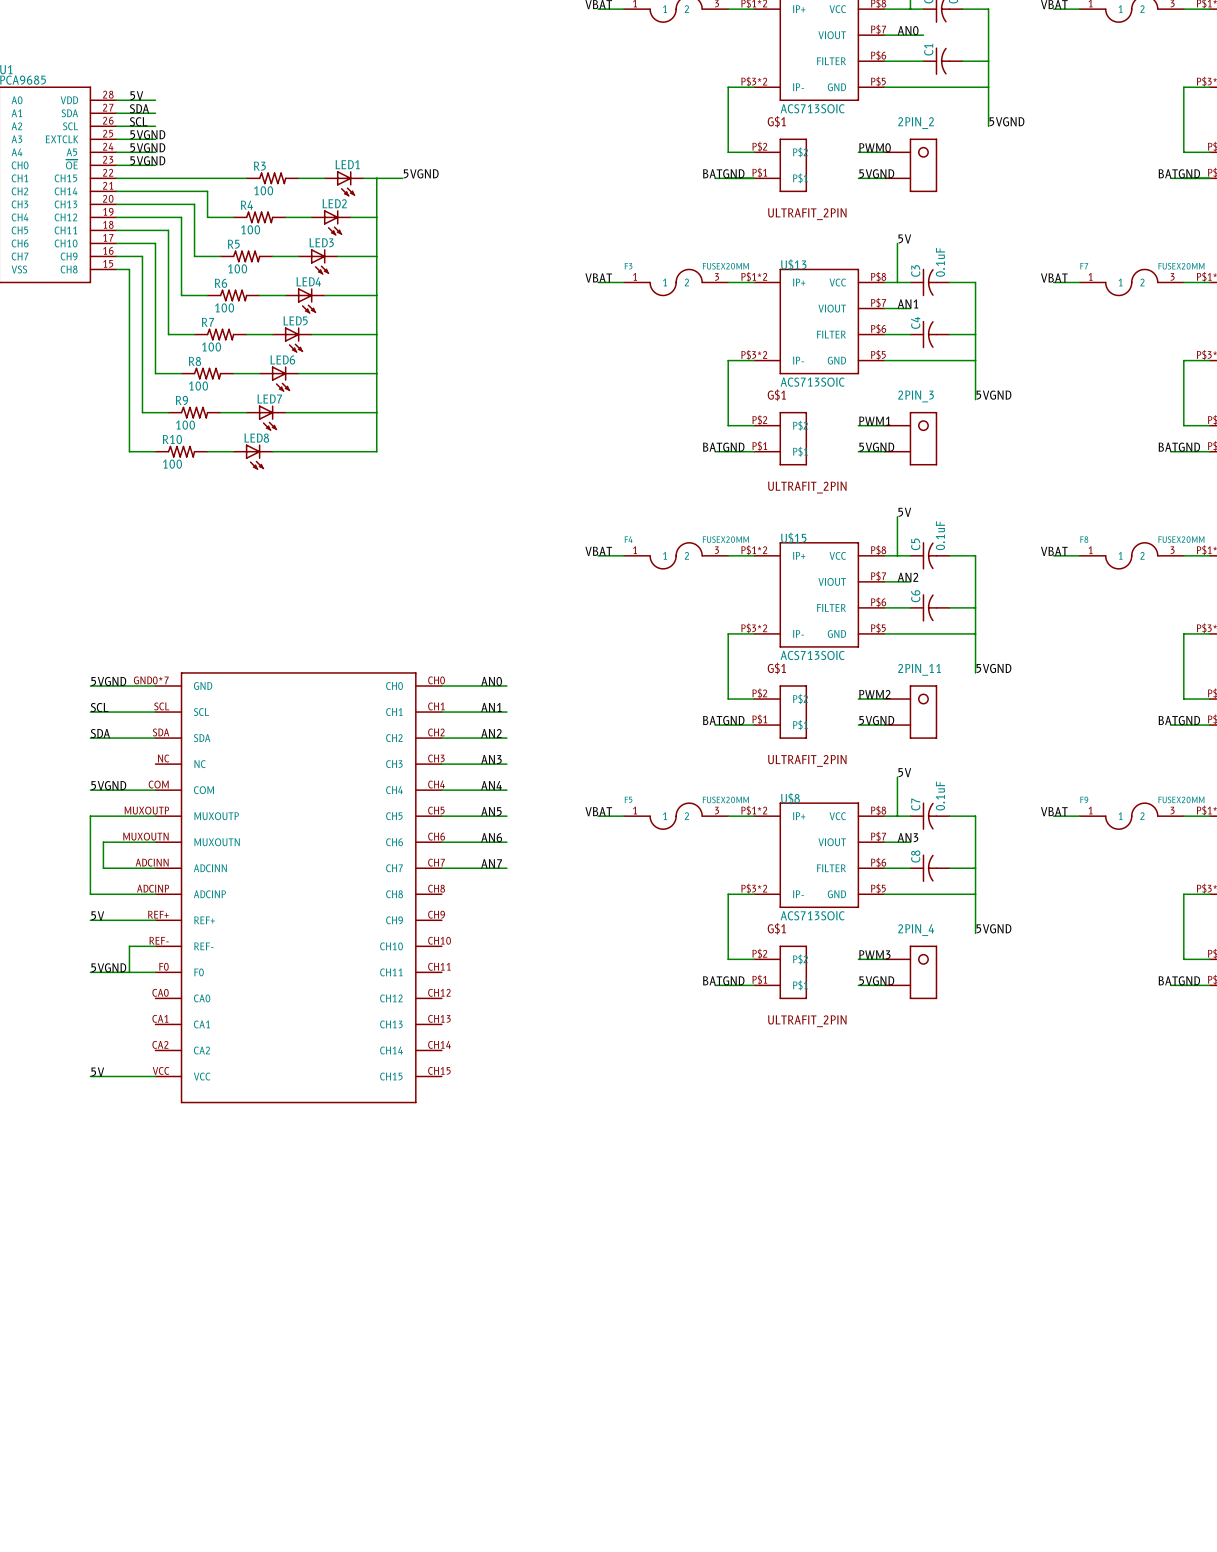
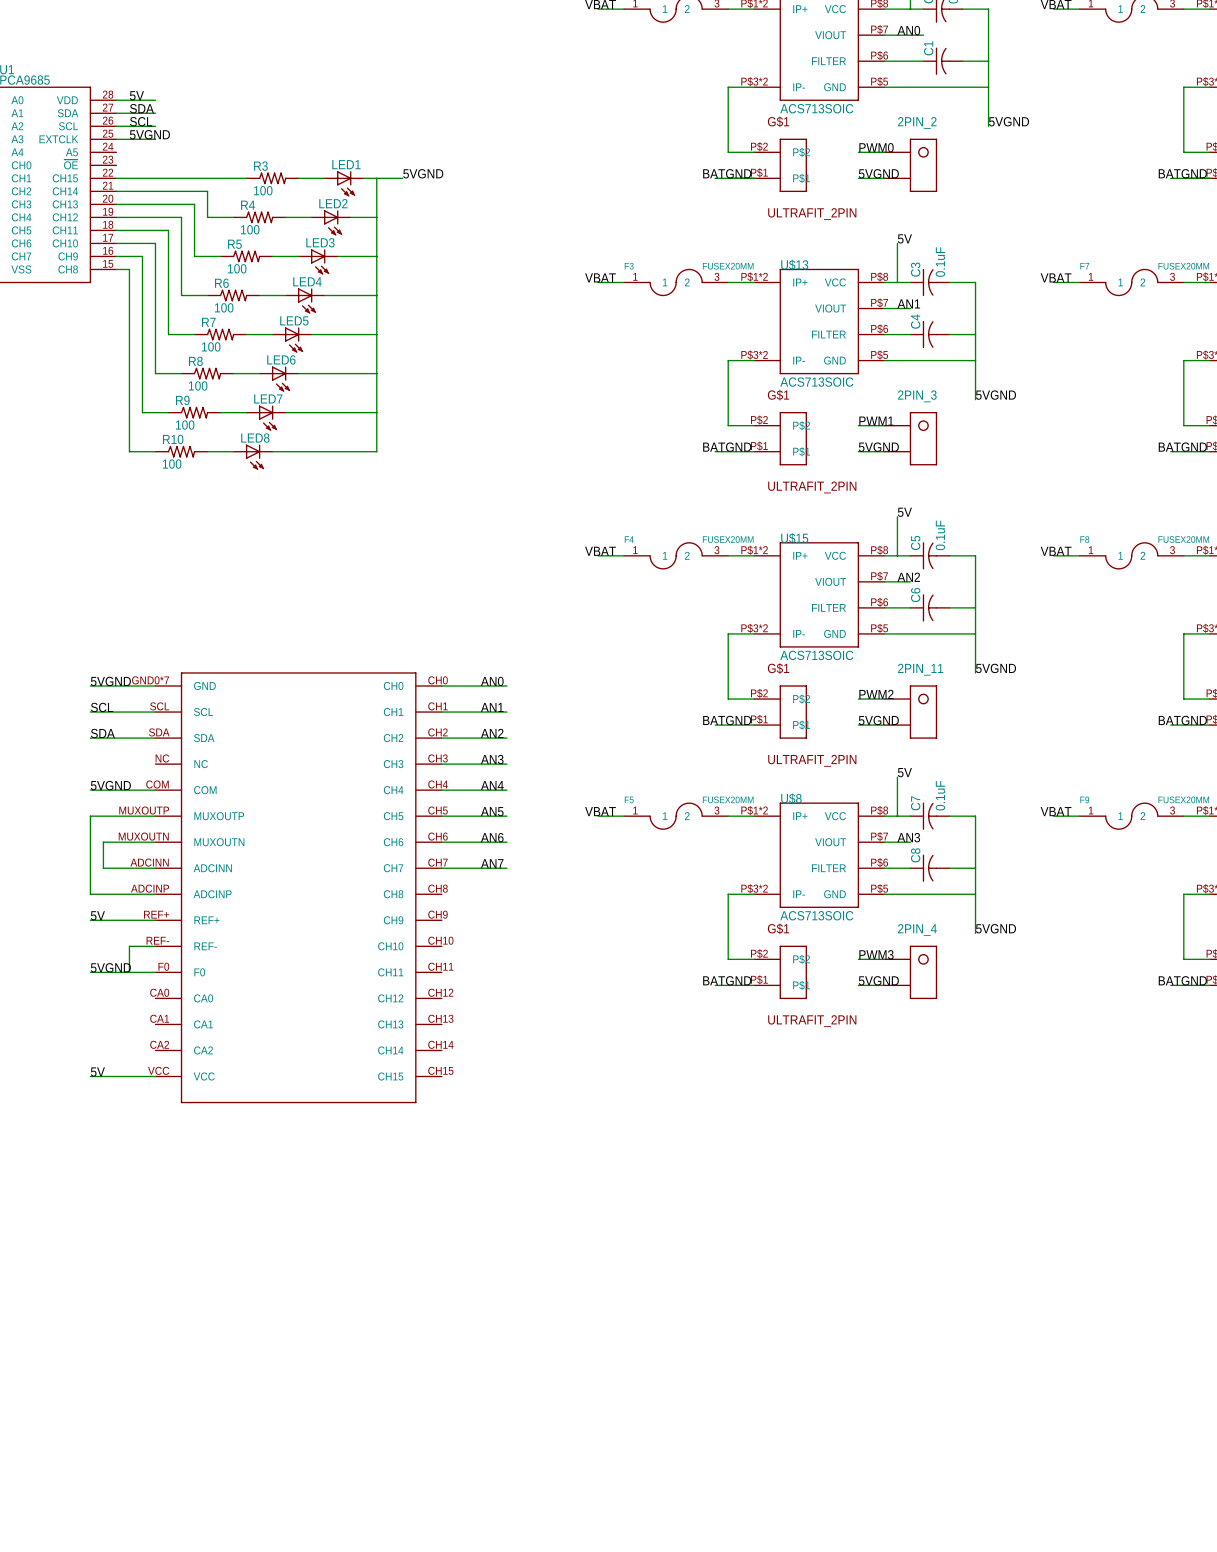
label: 5VGND (147, 147) -> none
wire: (116, 152) (155, 152) -> none
label: 5VGND (147, 160) -> none
wire: (116, 165) (155, 165) -> none

